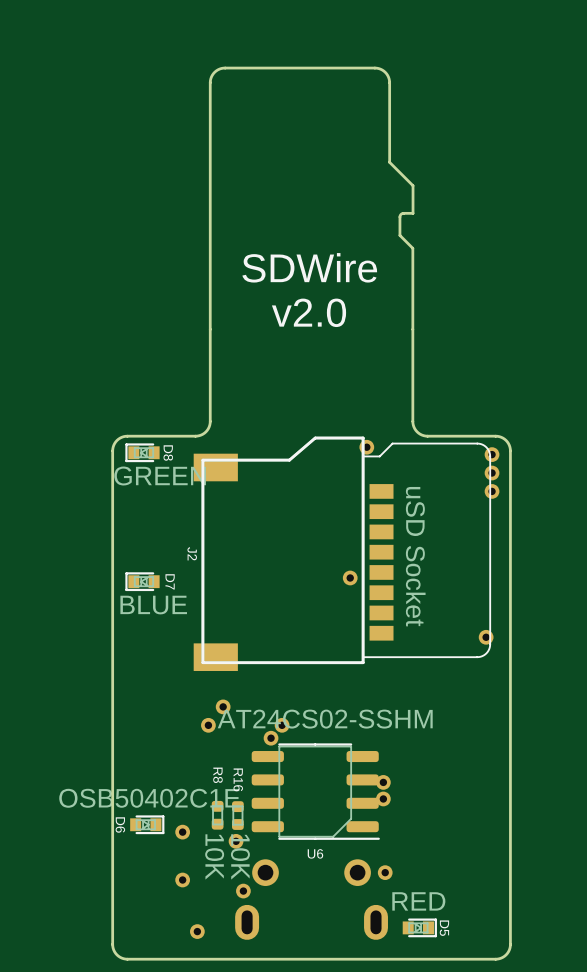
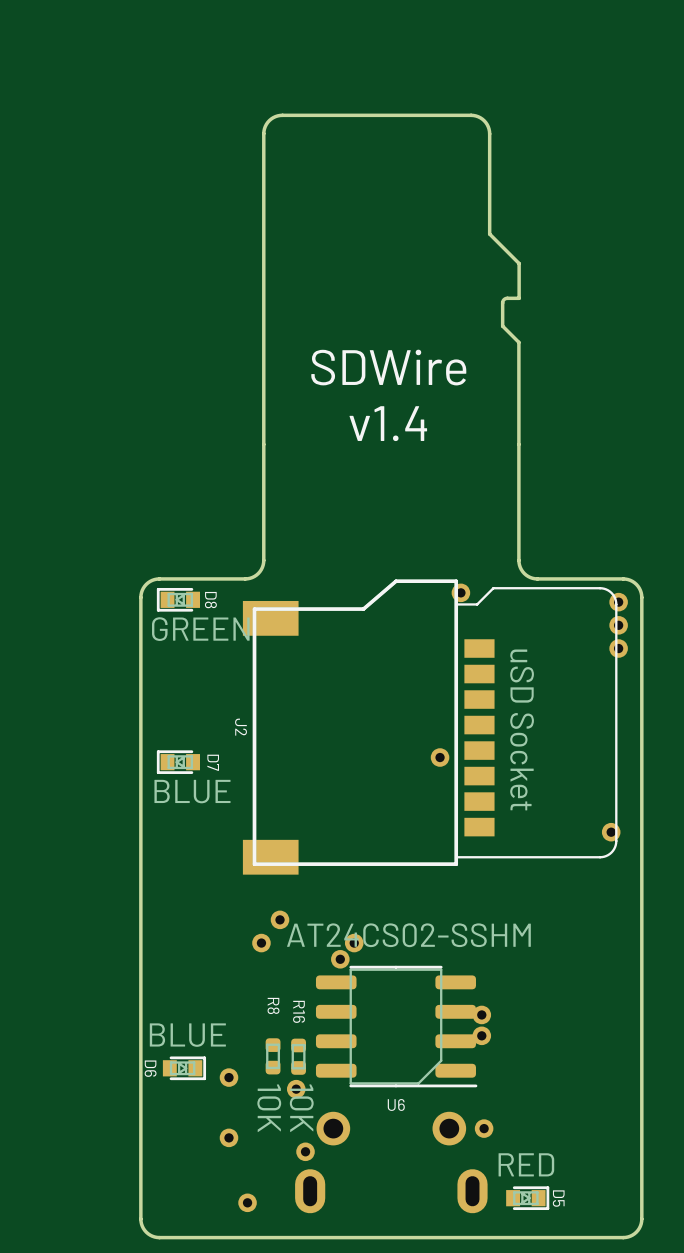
text: v2.0 (308, 312) -> v1.4 (388, 423)
D6 value: OSB50402C1E (149, 798) -> BLUE (187, 1035)

